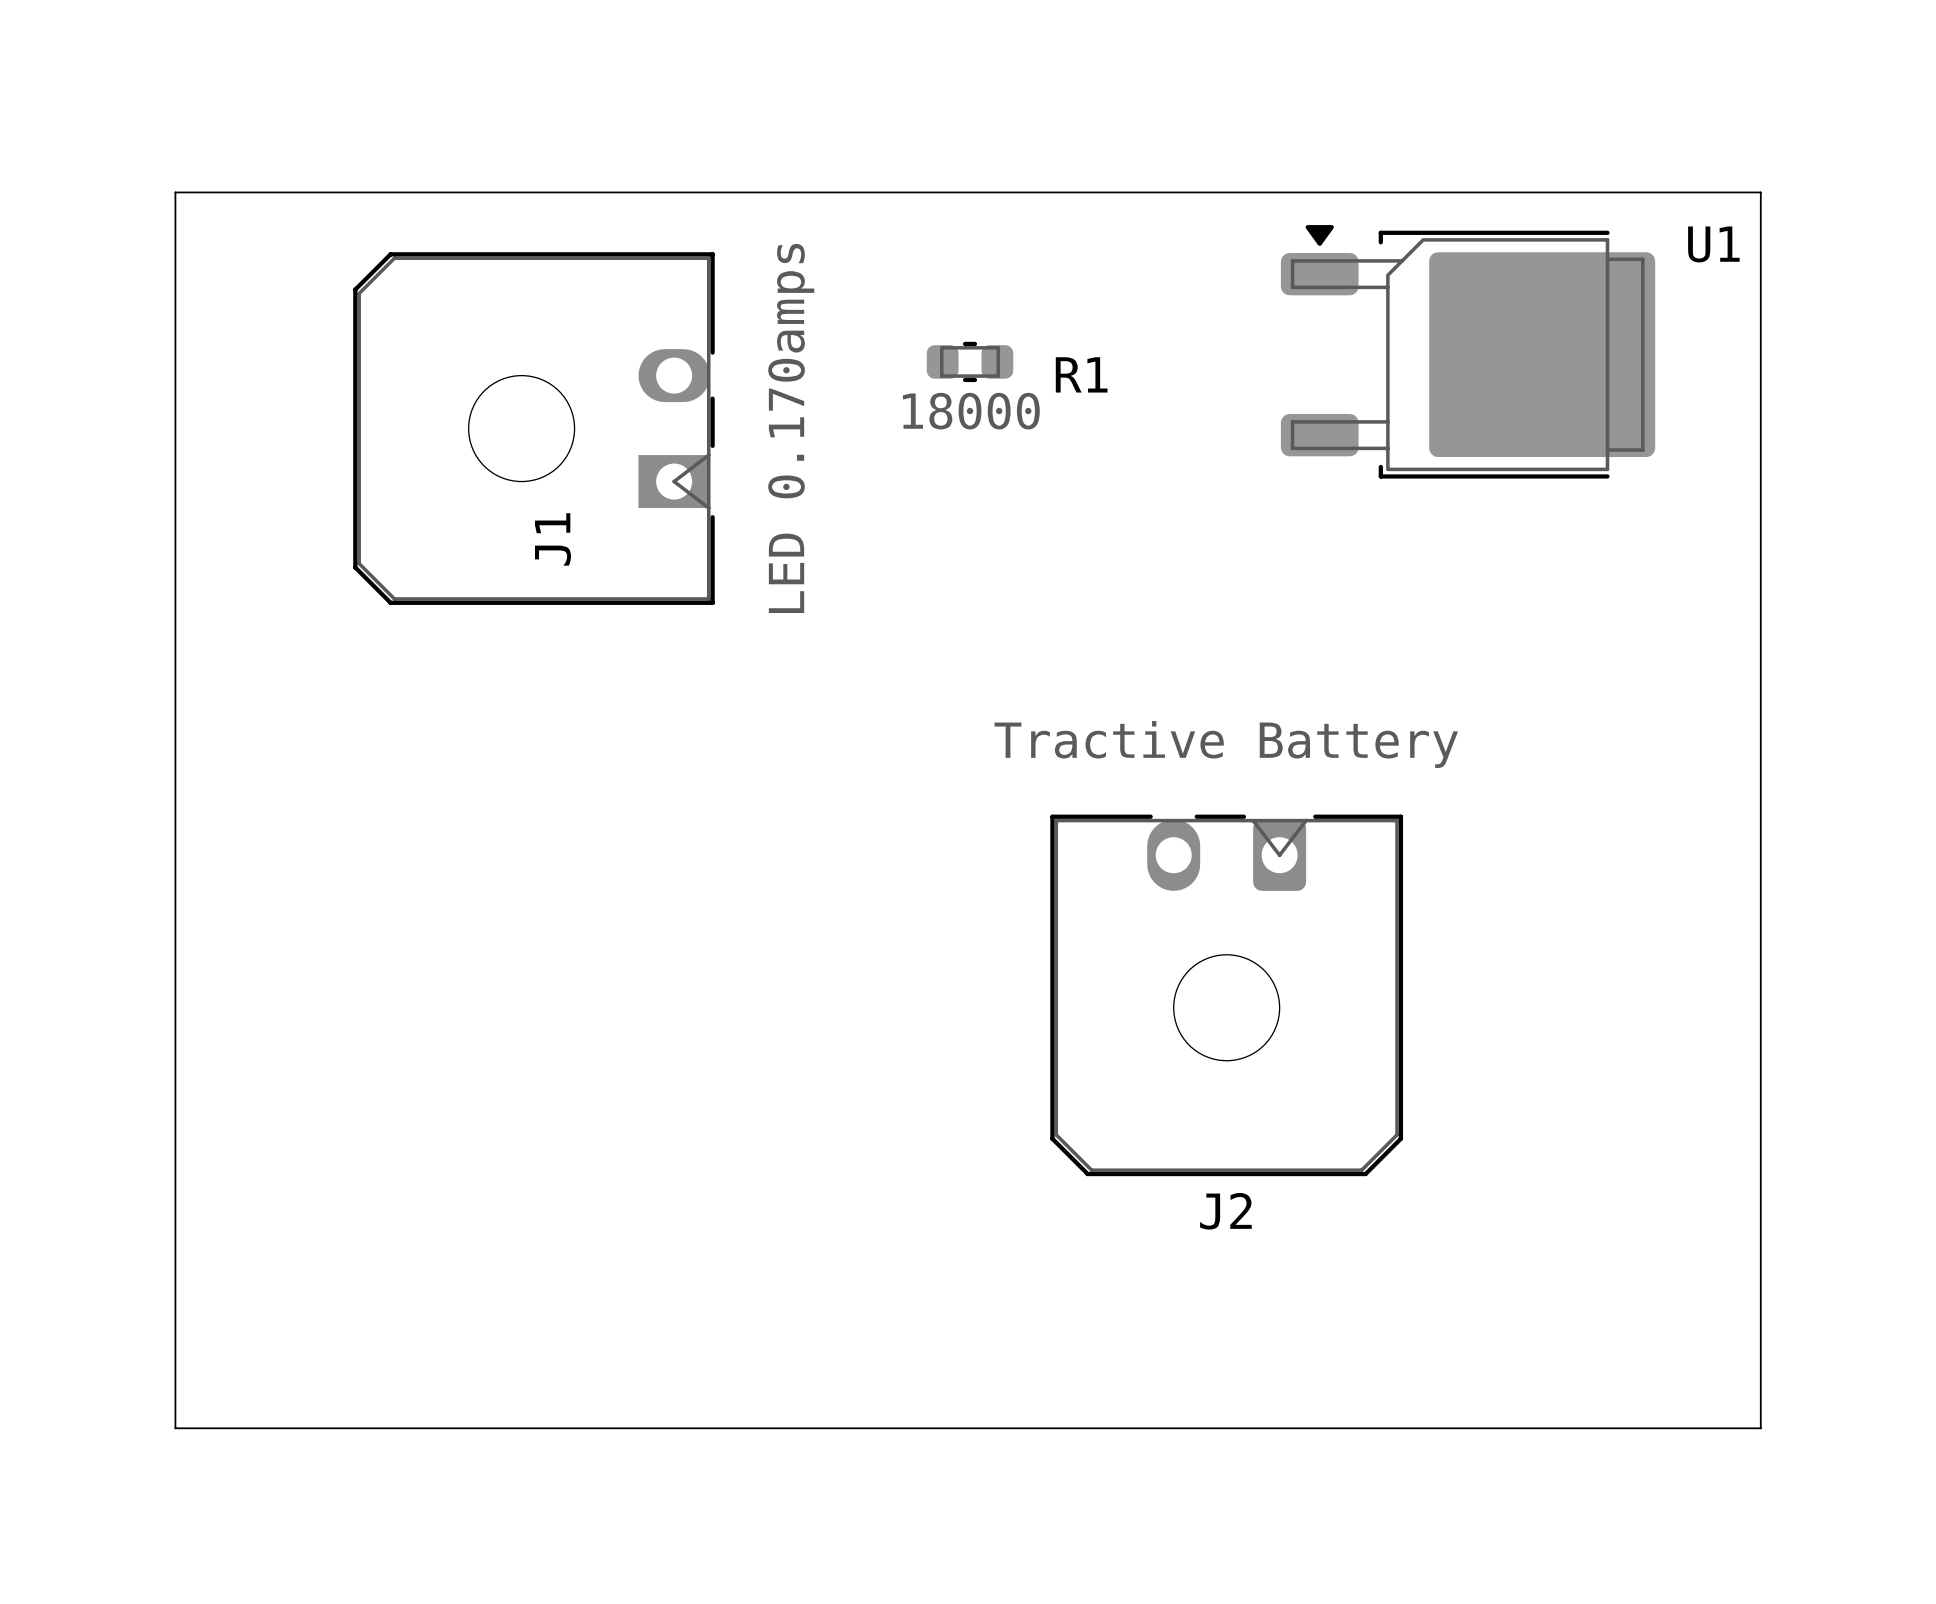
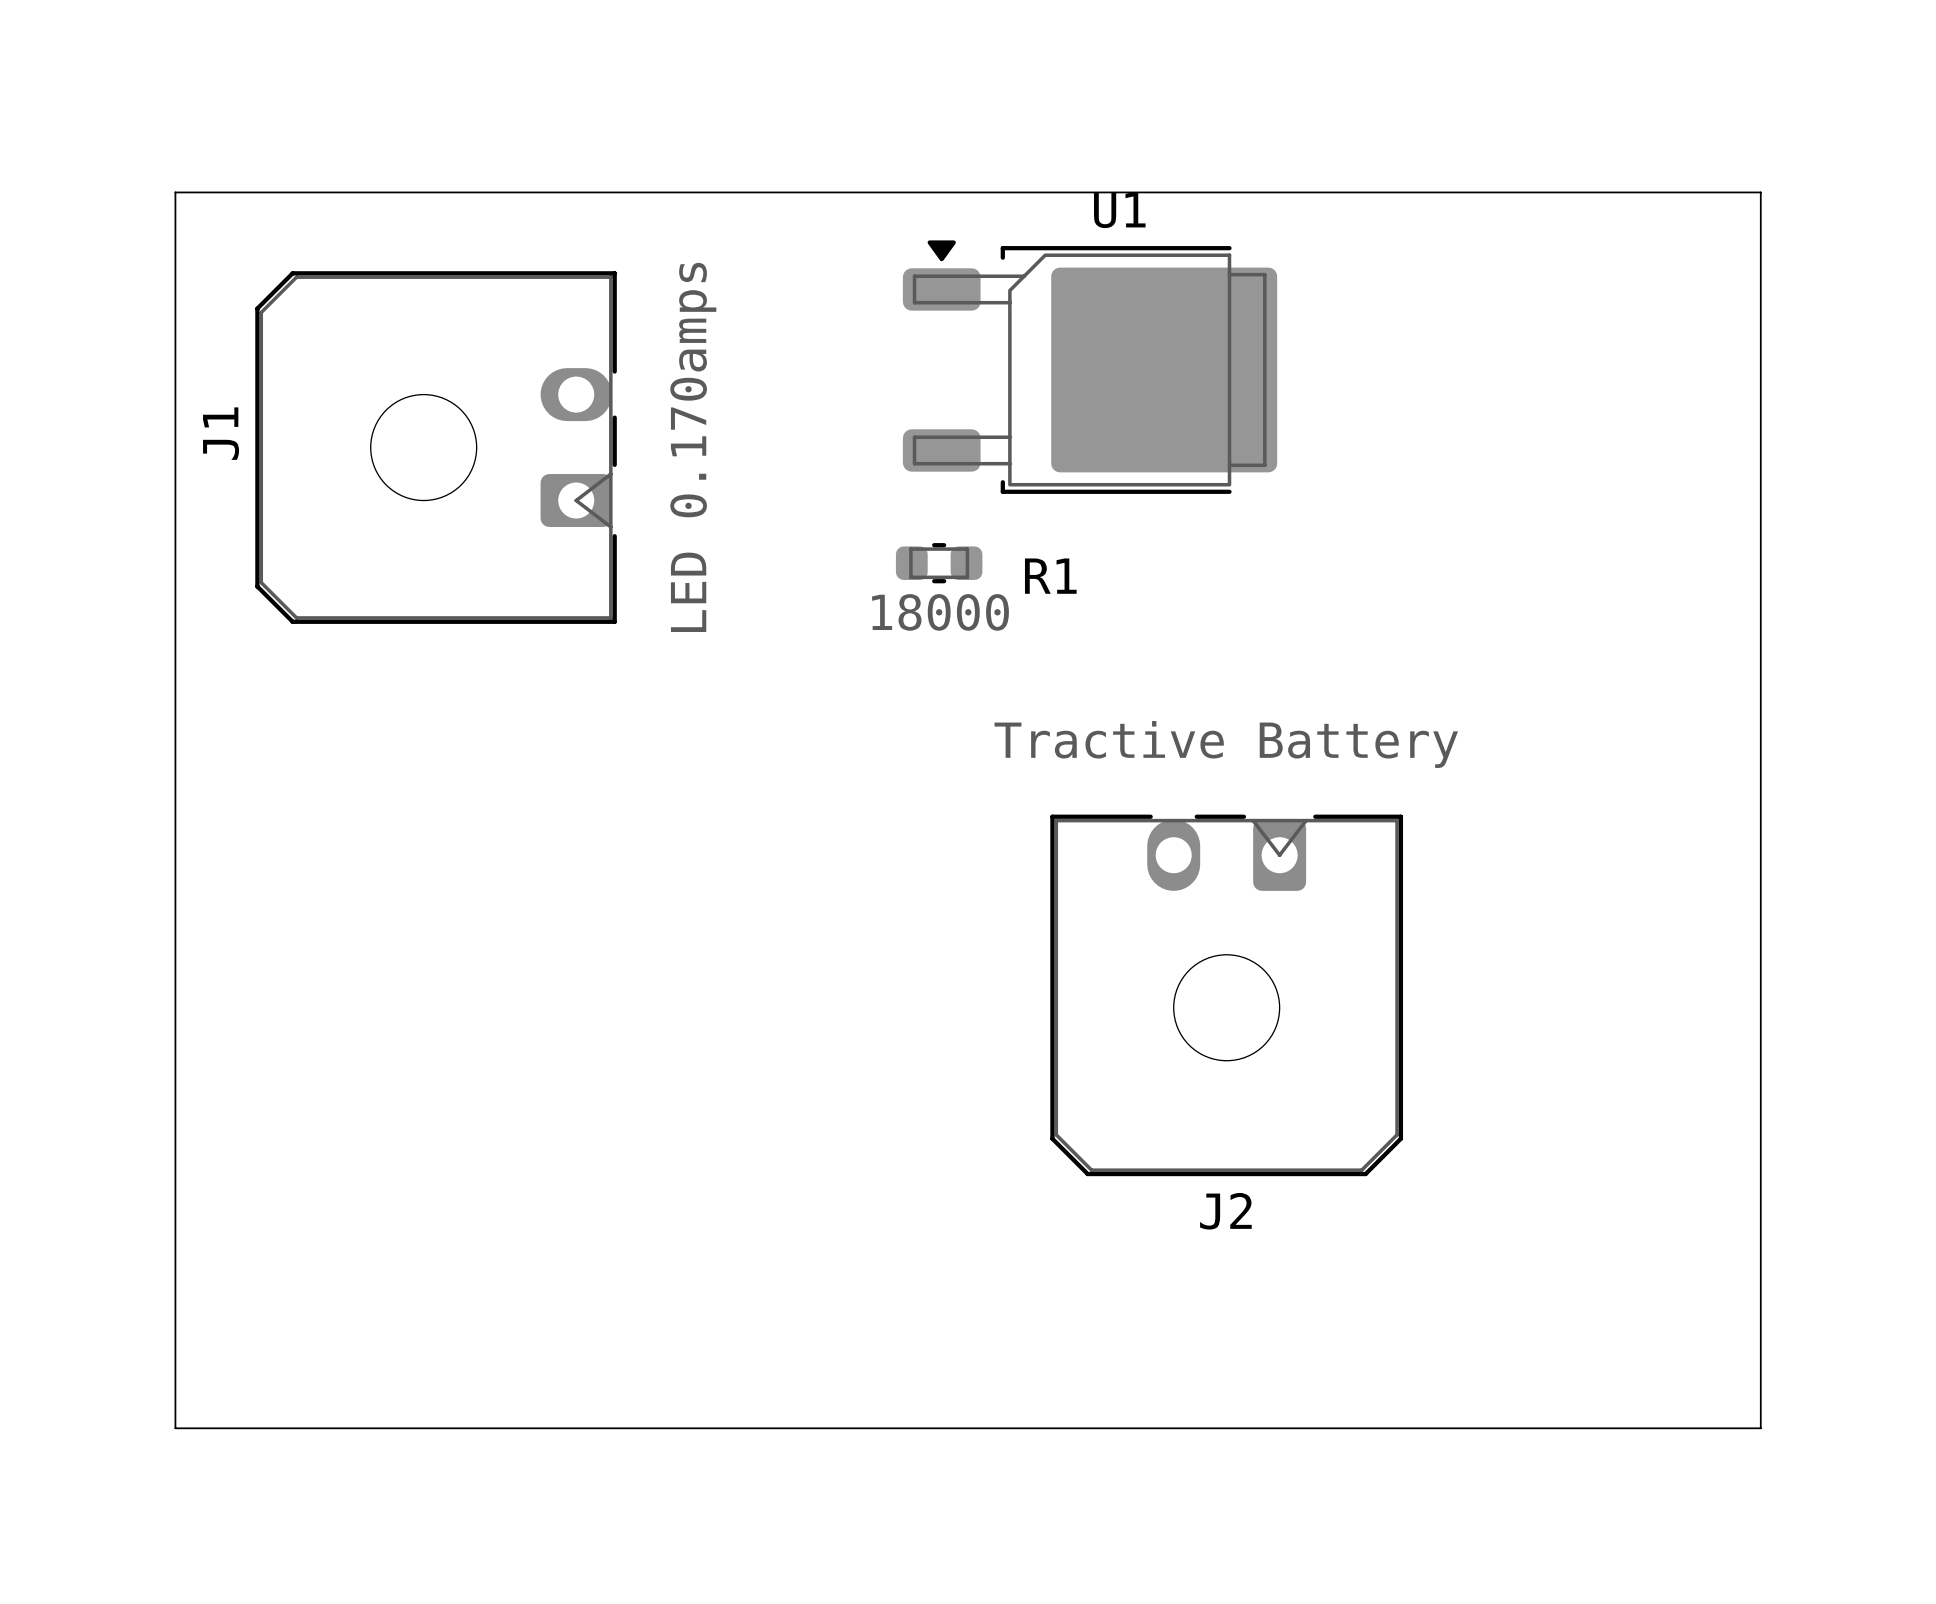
U1 name position: U1 (1713, 244) -> U1 (1119, 210)
J1 footprint: [353, 252, 715, 605] -> [255, 271, 617, 624]
U1 position: (1468, 351) -> (1090, 367)
R1 position: (970, 361) -> (939, 563)
J1 name position: J1 (553, 539) -> J1 (221, 433)

